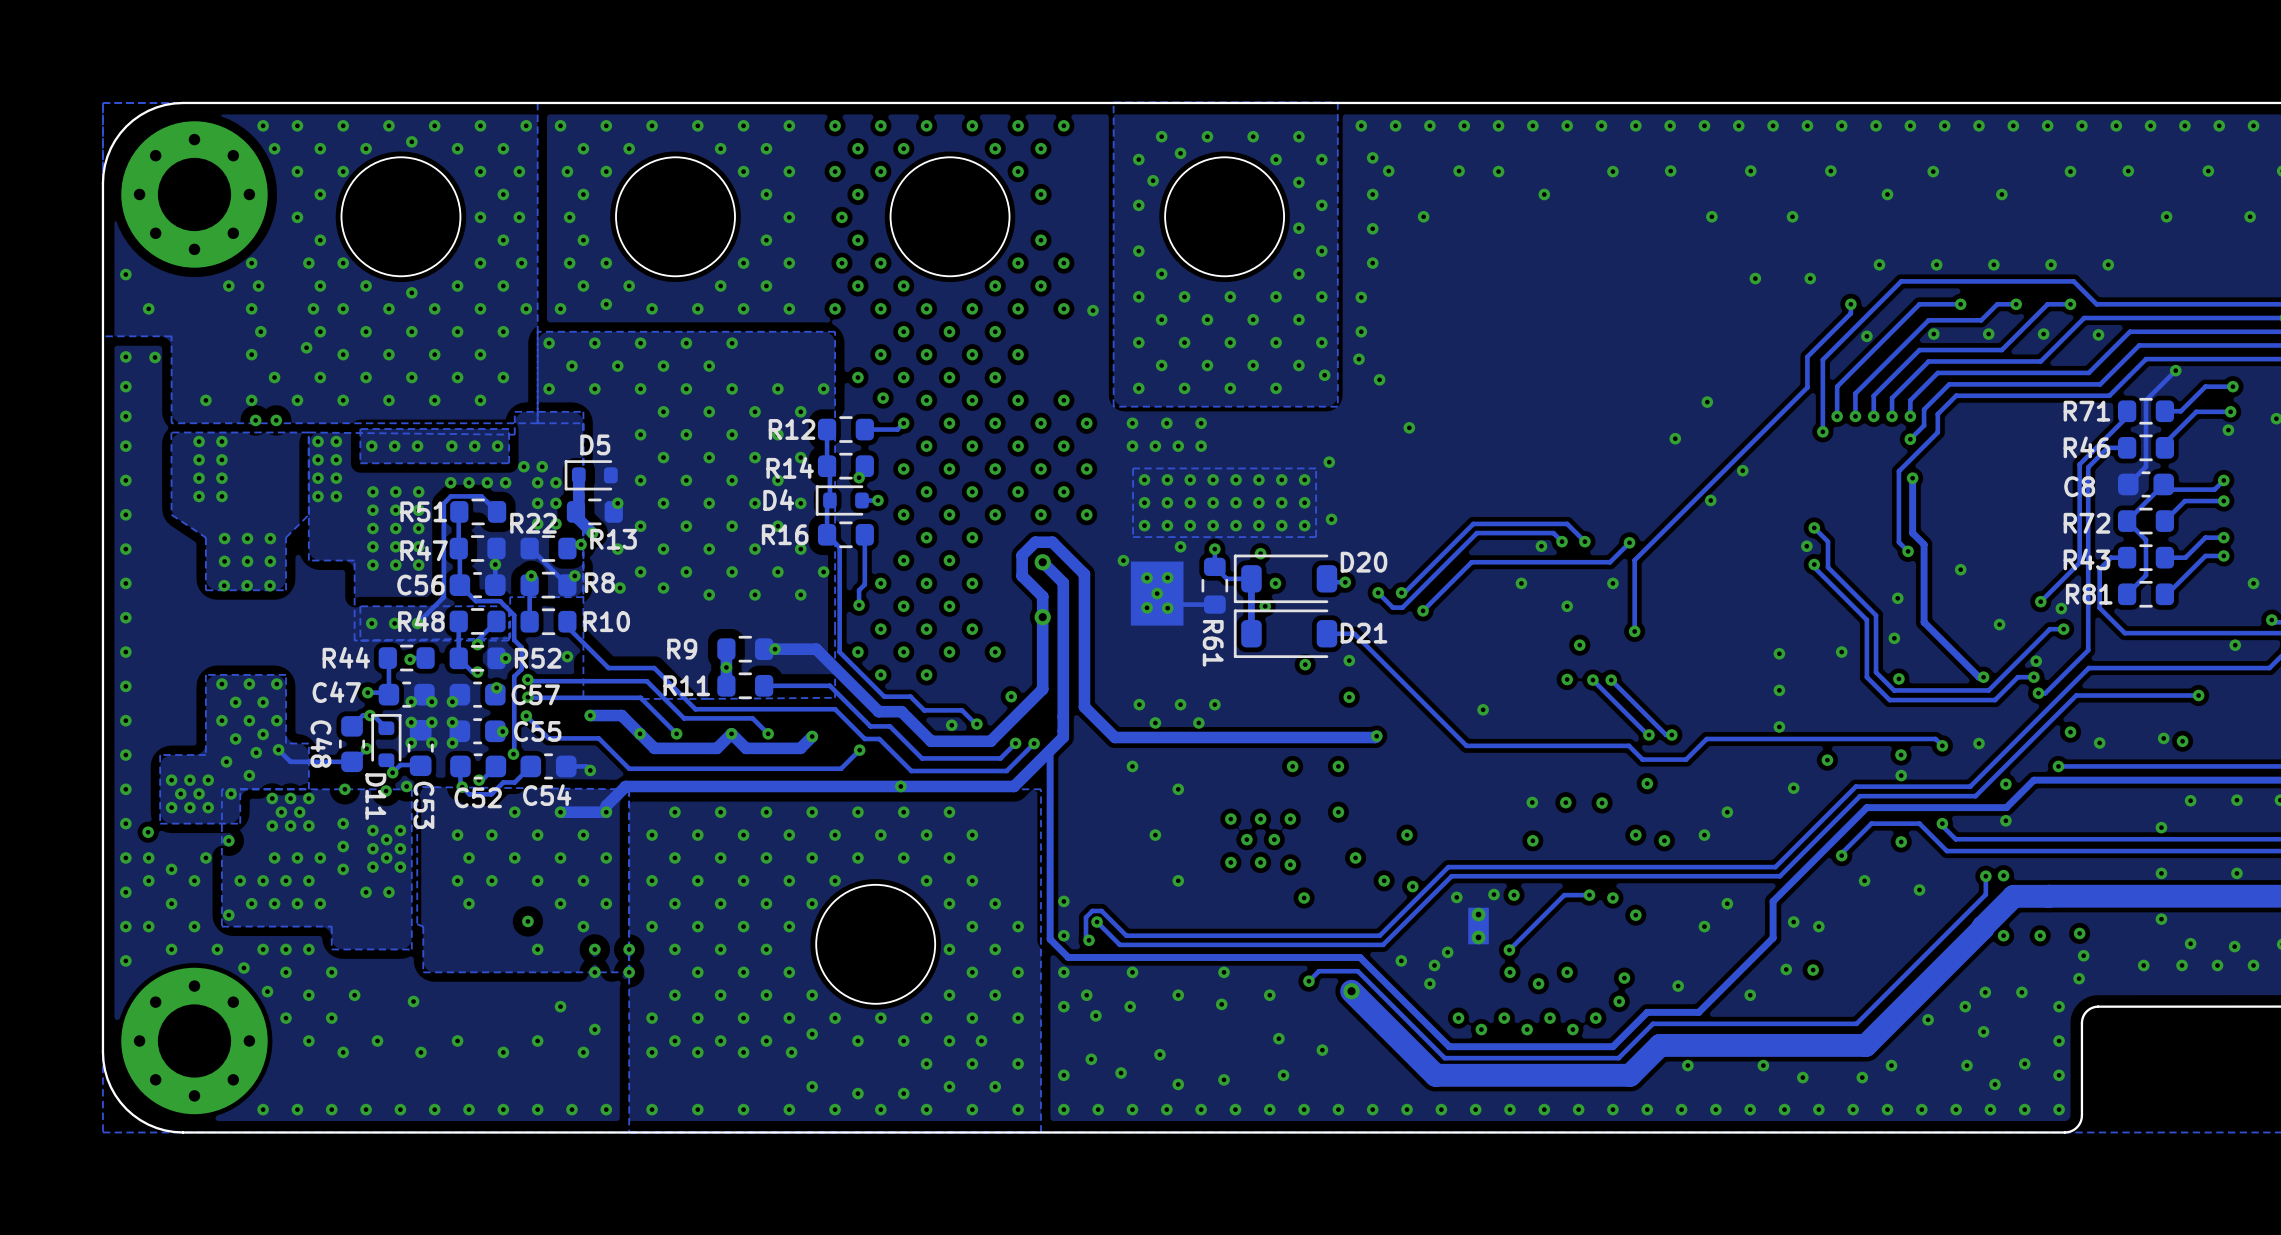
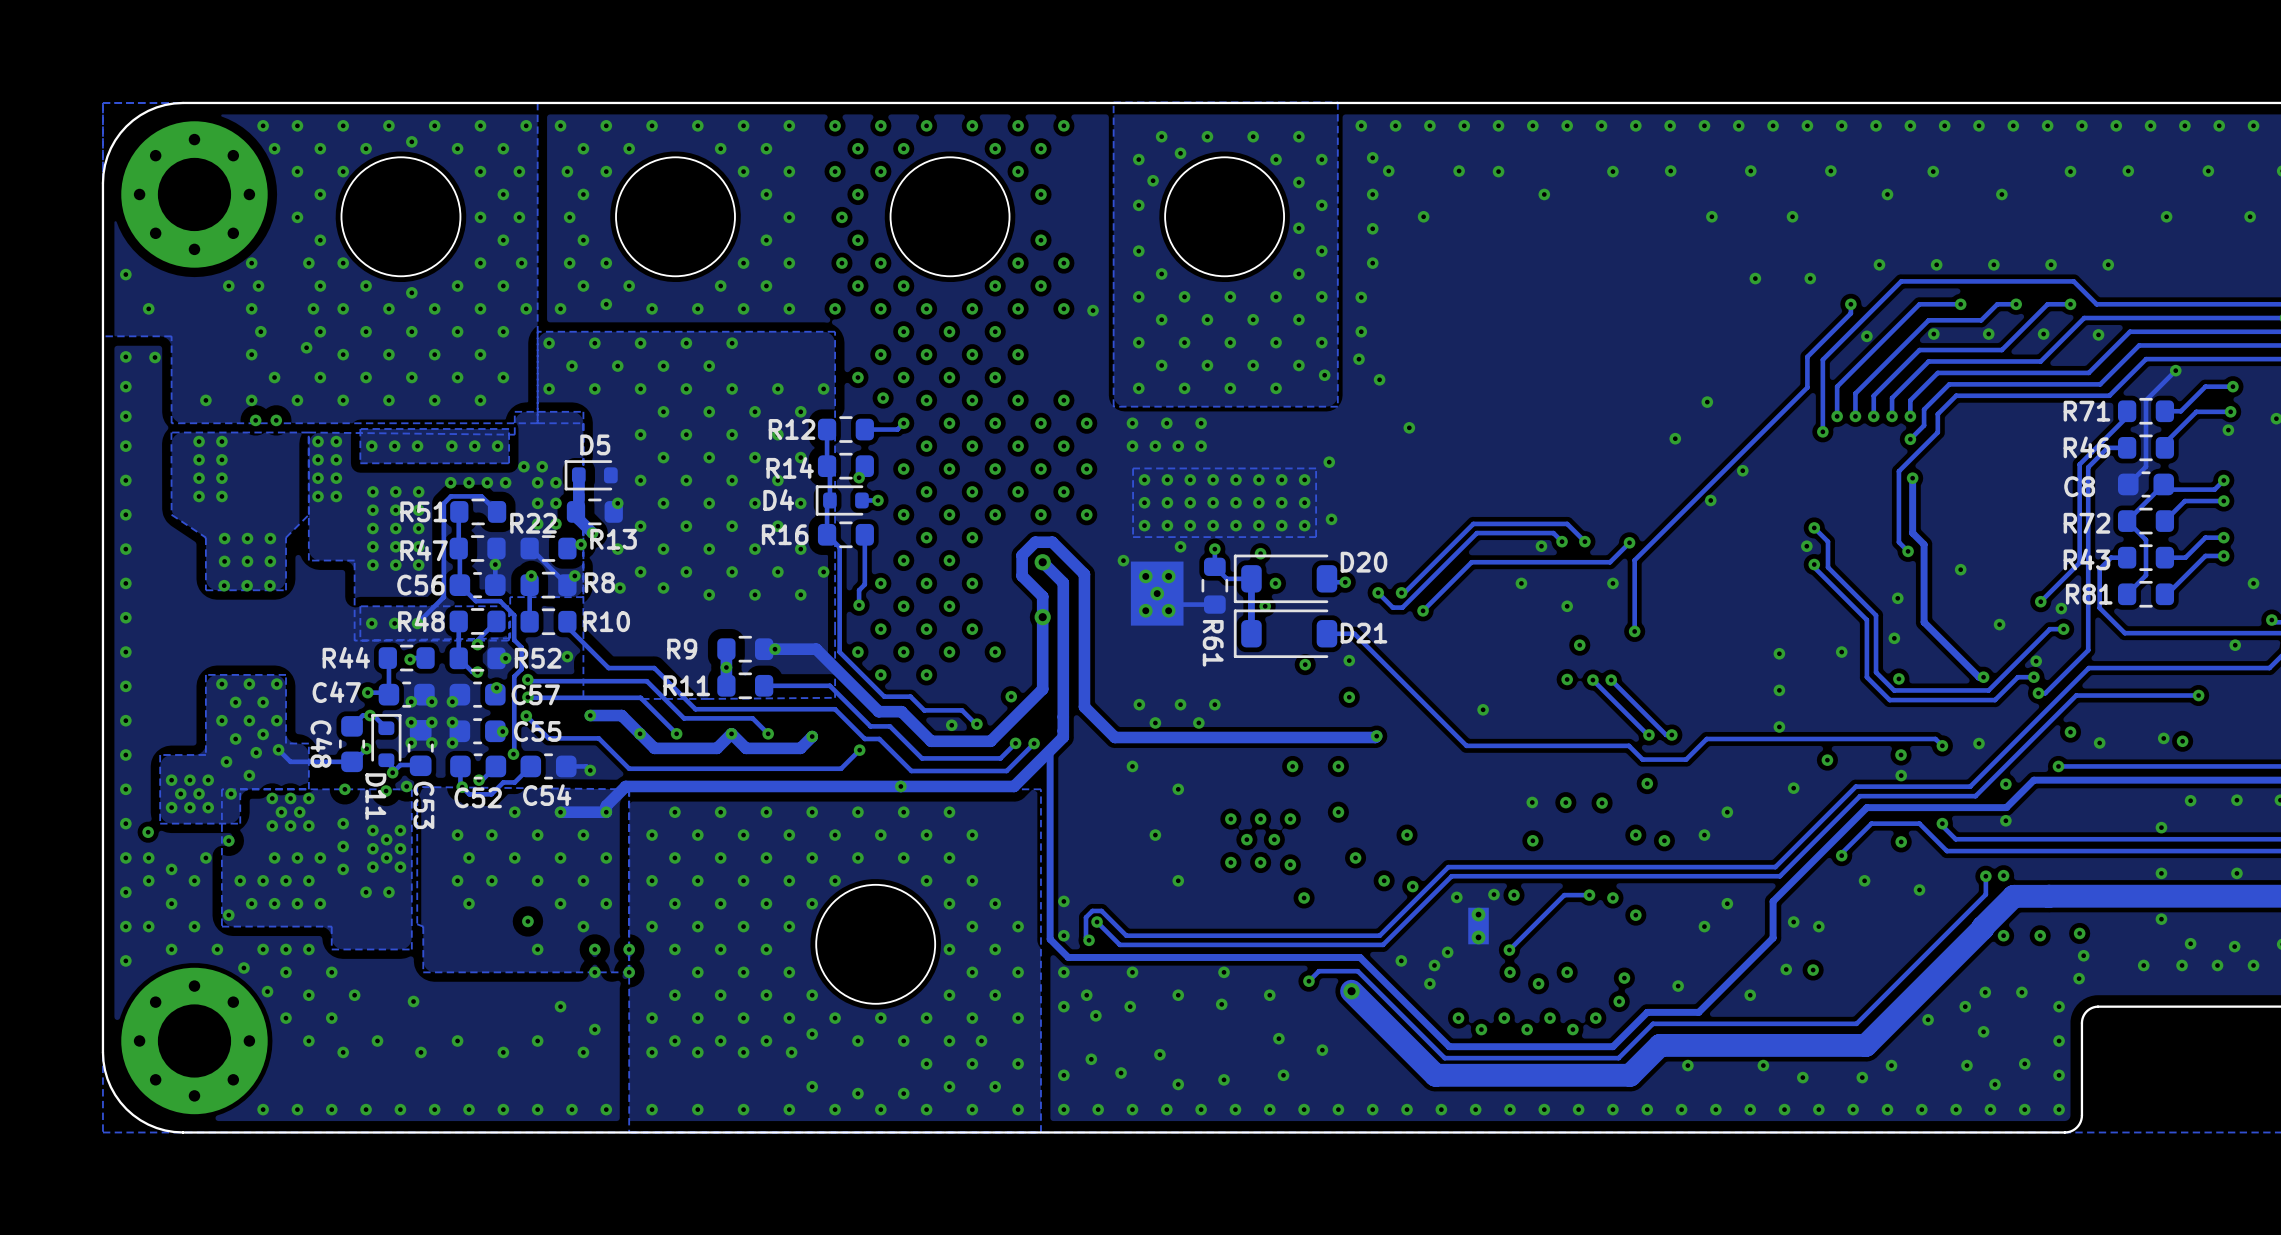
part footprint: [1130, 561, 1184, 626] -> [1130, 561, 1184, 626]
via: (1147, 577) -> none
via: (1167, 577) -> none
via: (1157, 593) -> none
via: (1147, 607) -> none
via: (1167, 608) -> none

